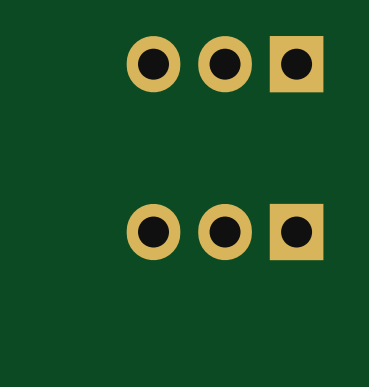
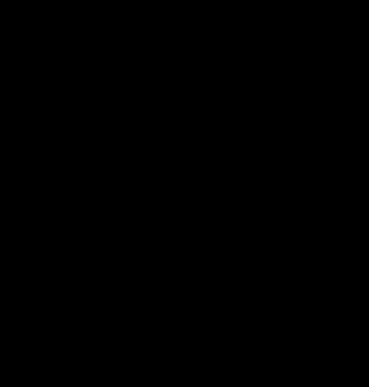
part: (225, 64) -> none
part: (225, 232) -> none

